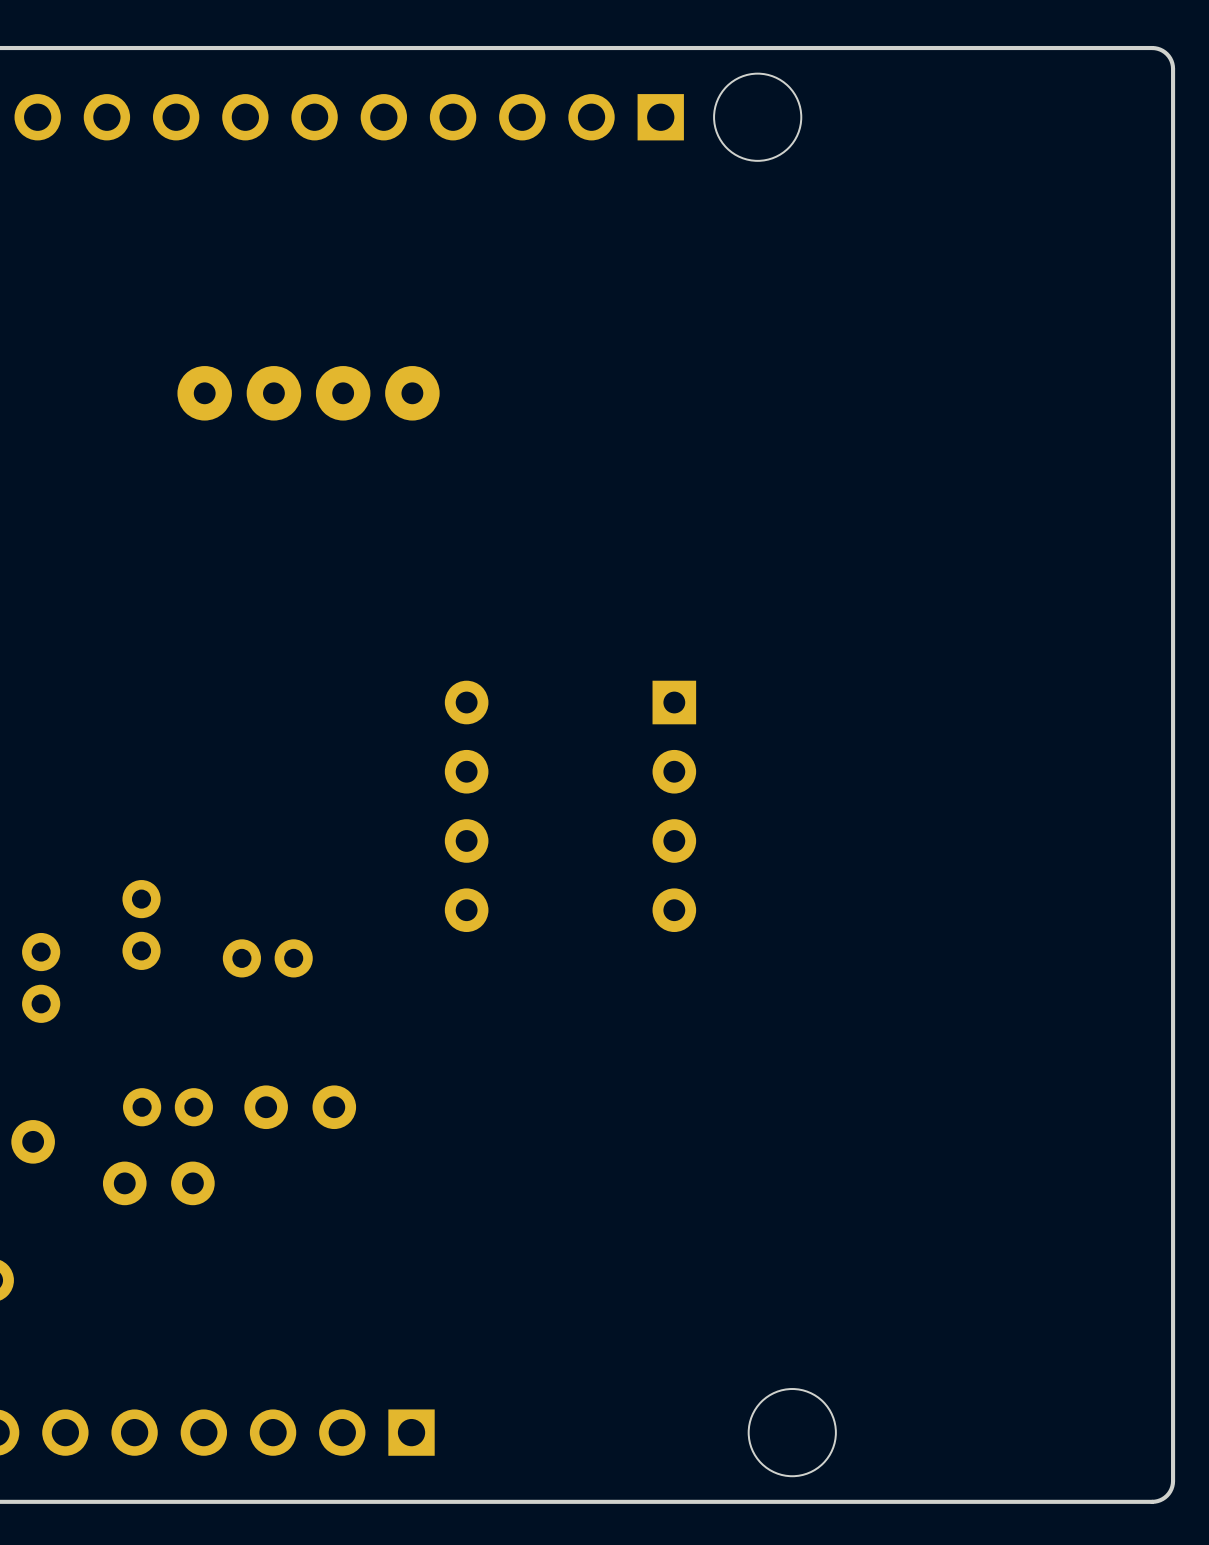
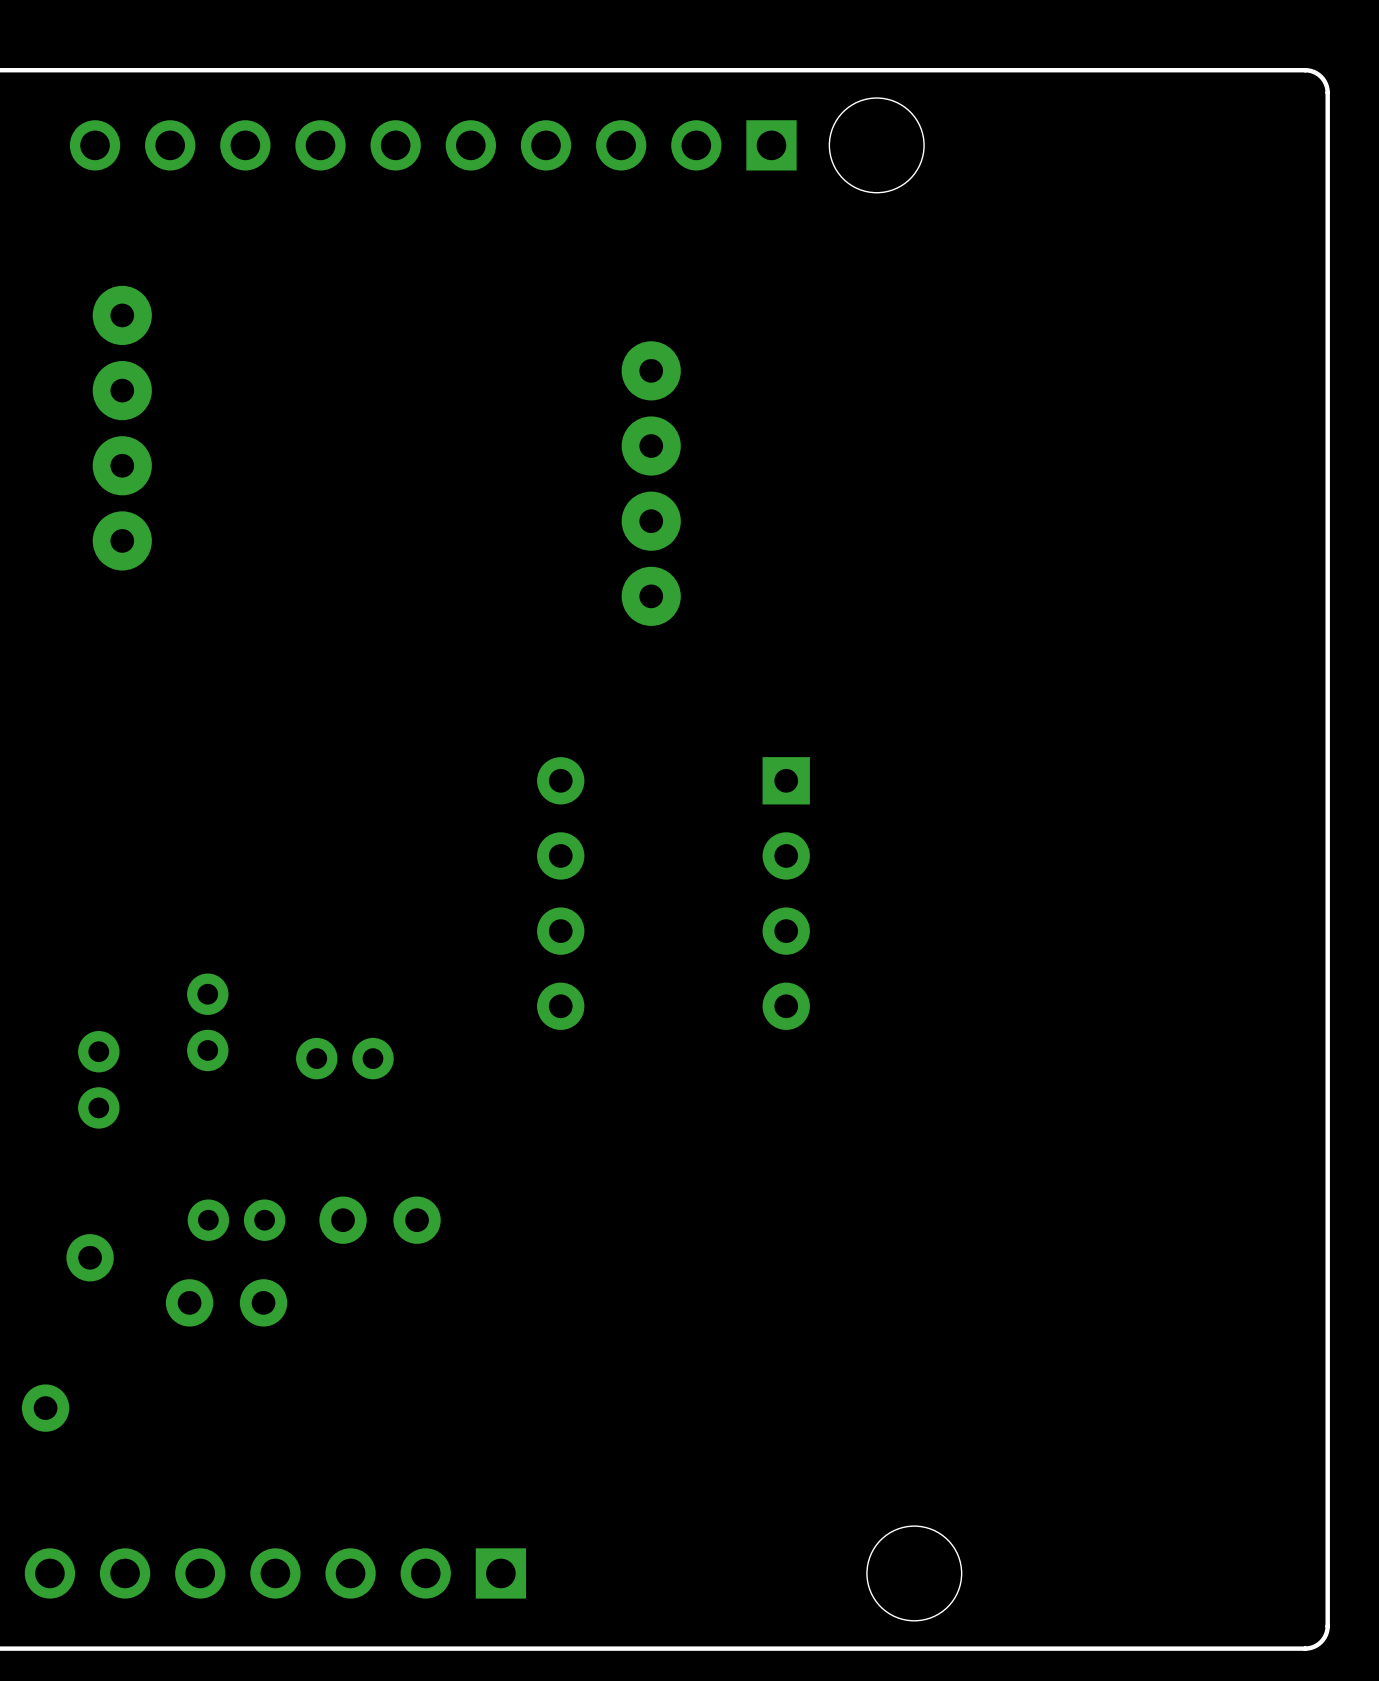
part: none -> (122, 428)
part: (308, 393) -> none
part: none -> (651, 483)

